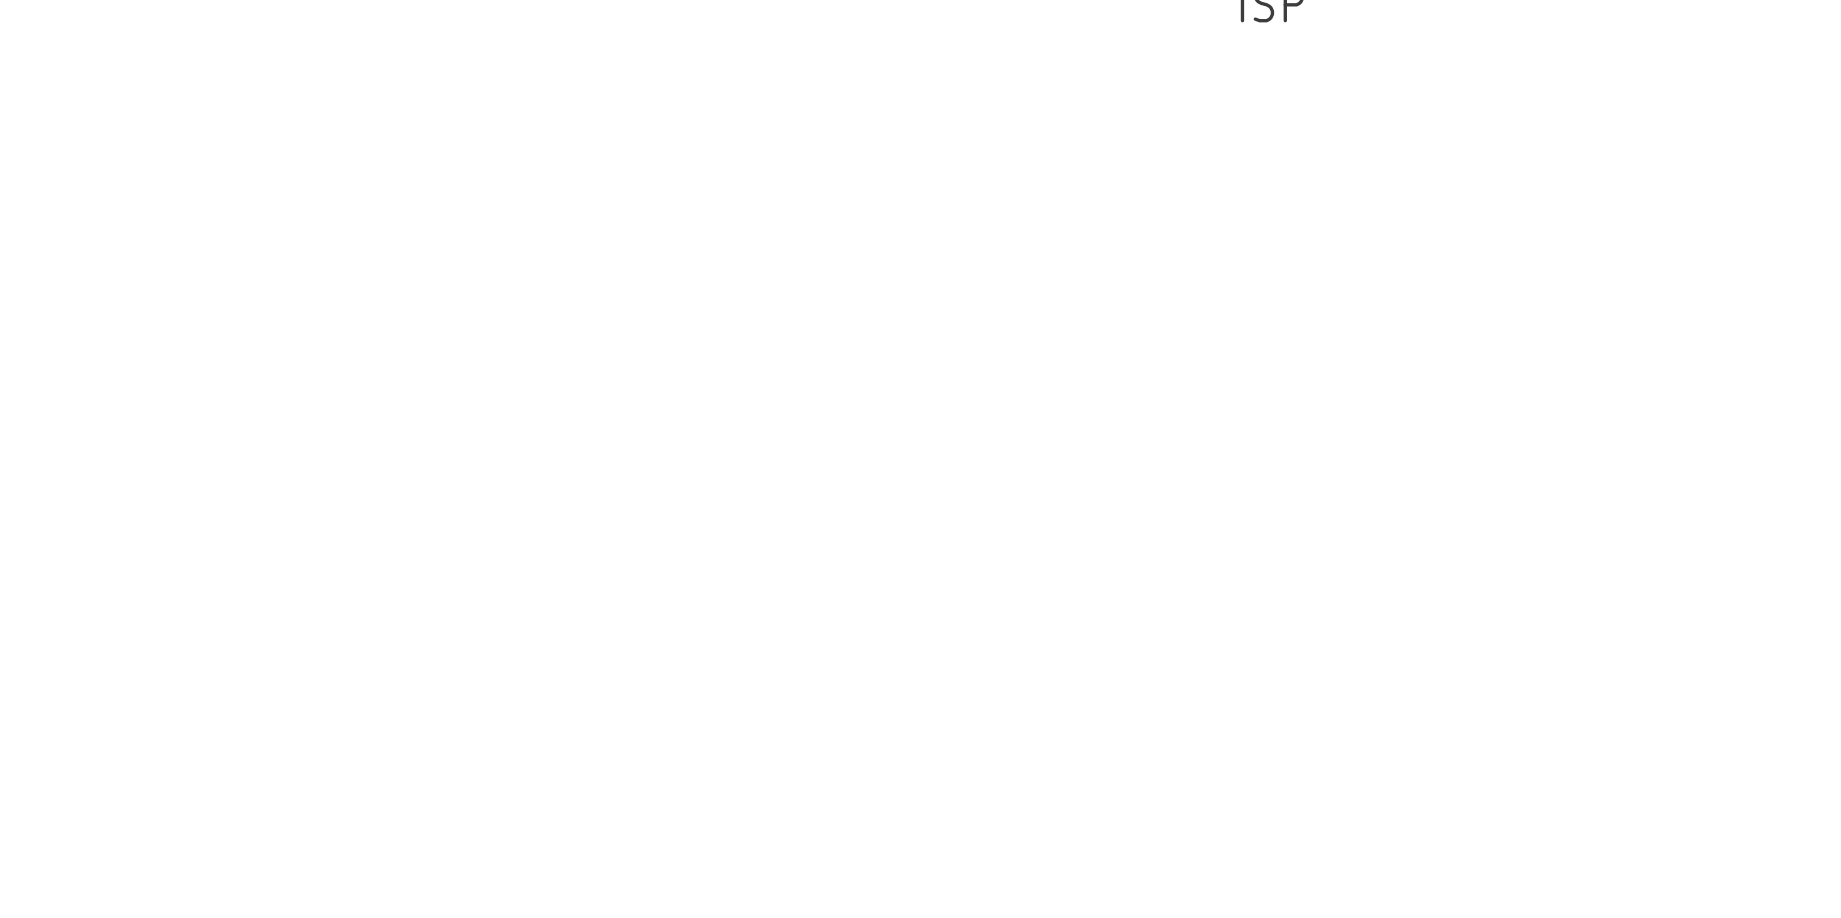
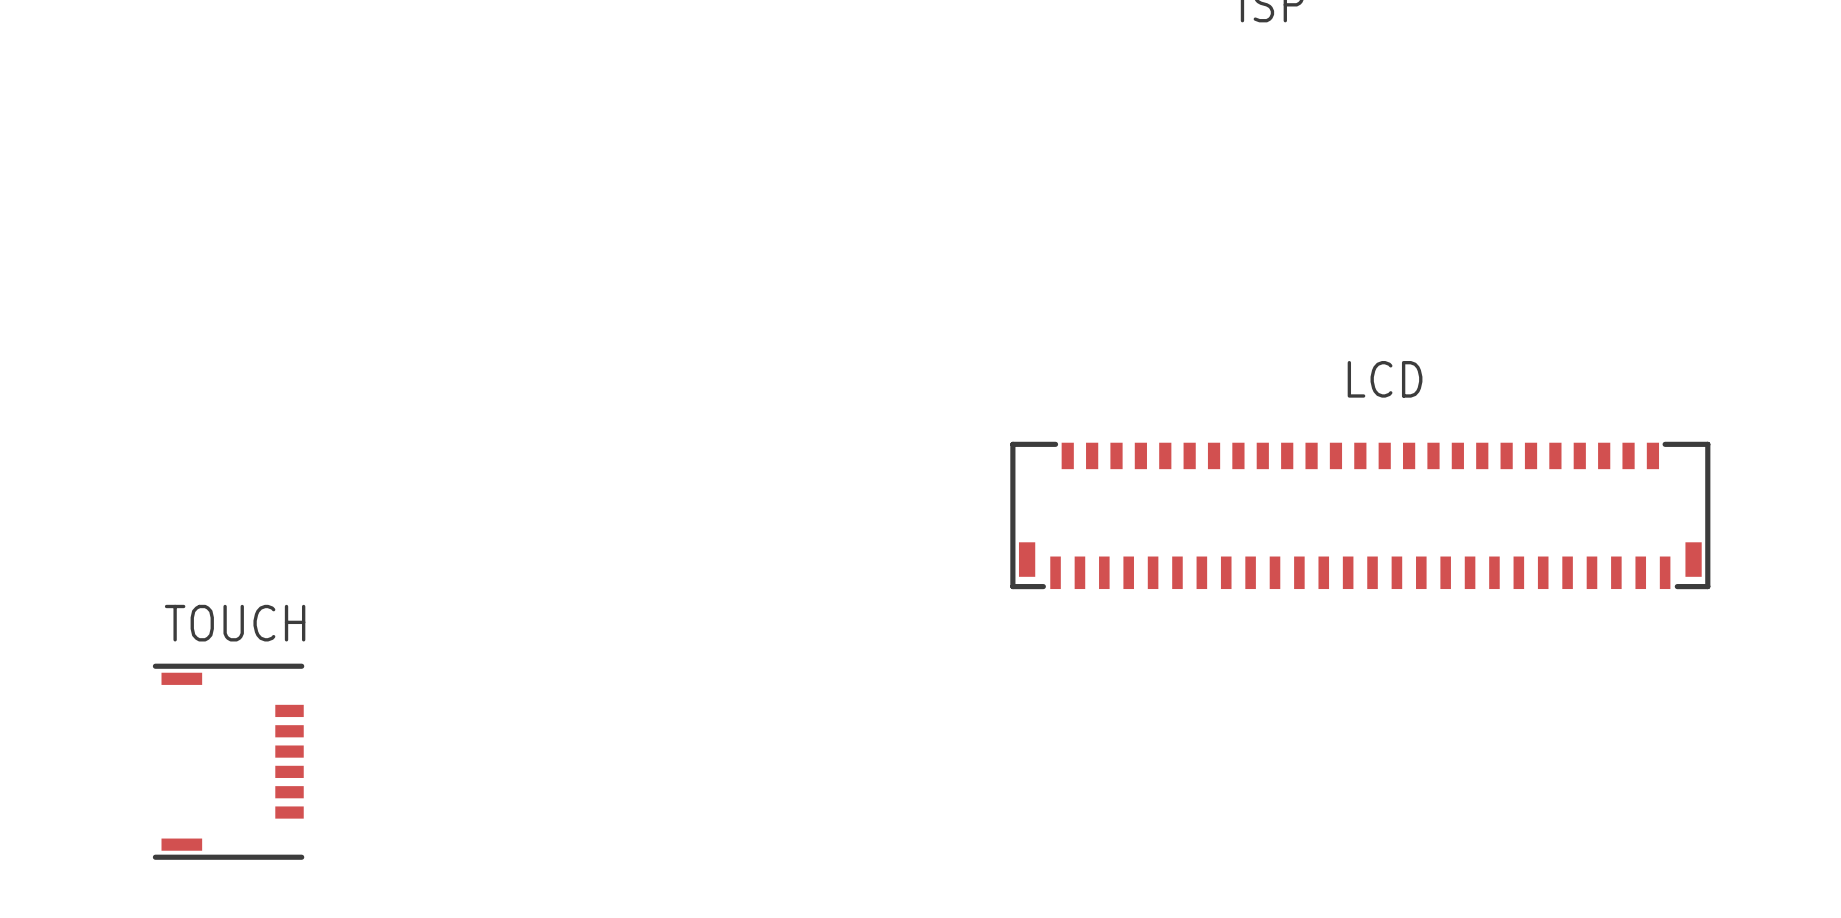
LCD: none -> (1360, 515)
TOUCH: none -> (228, 761)

